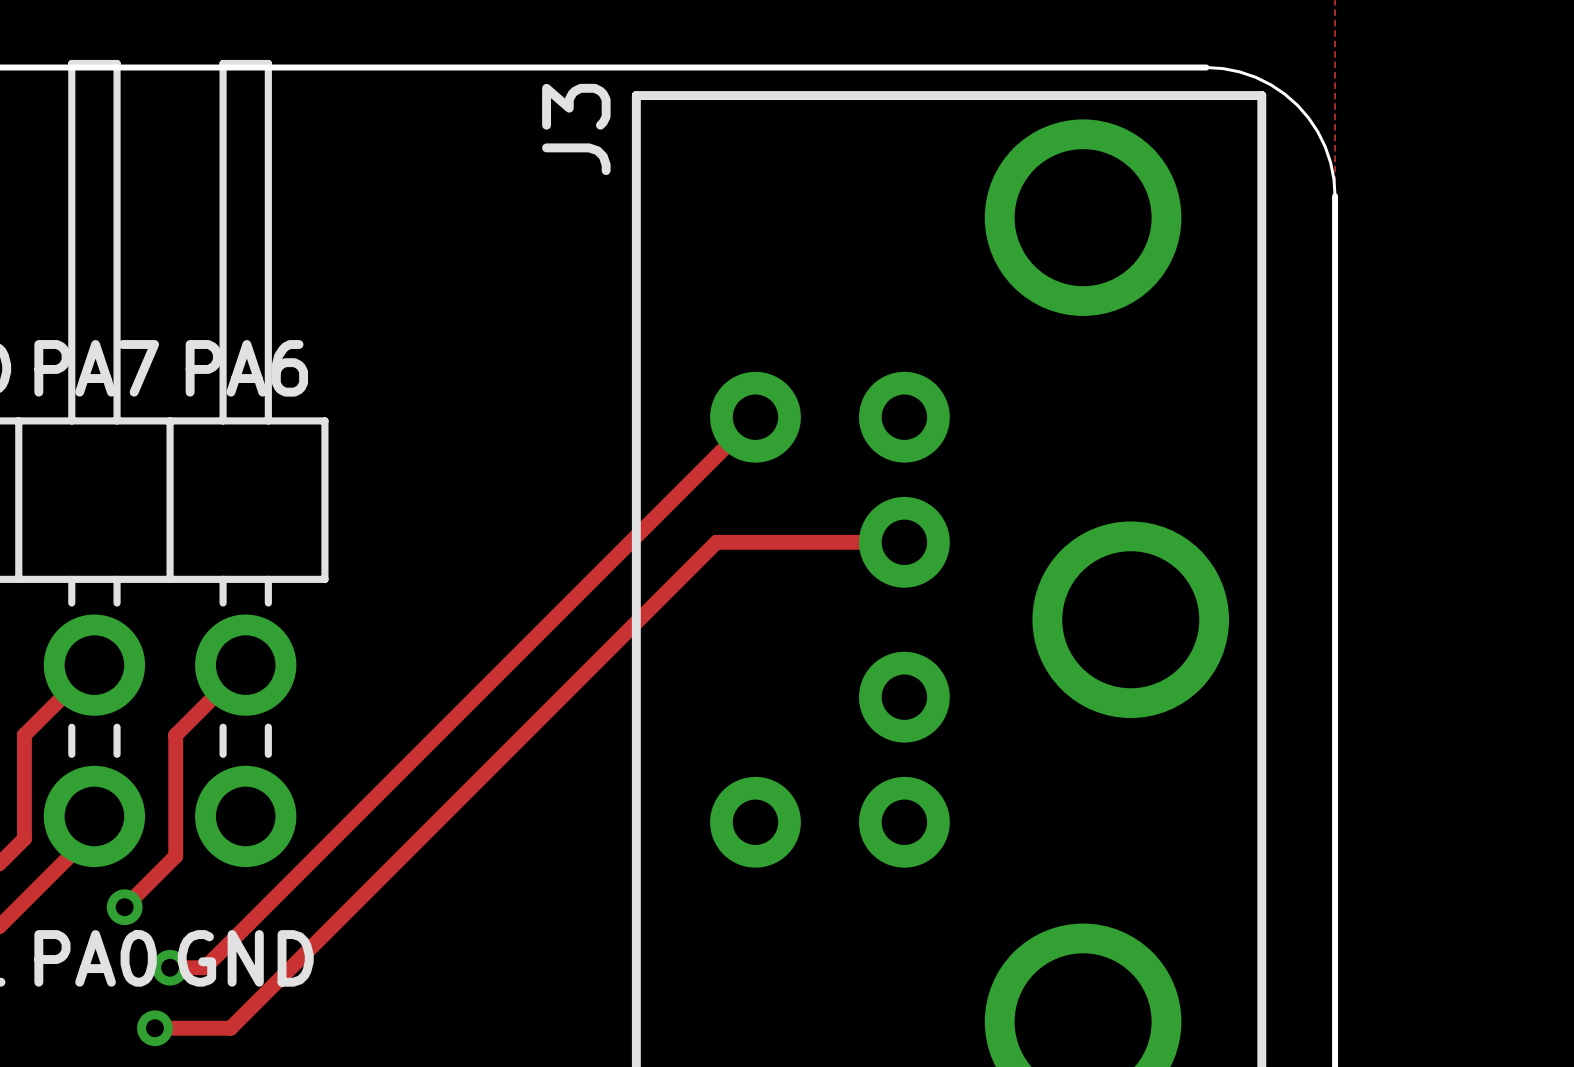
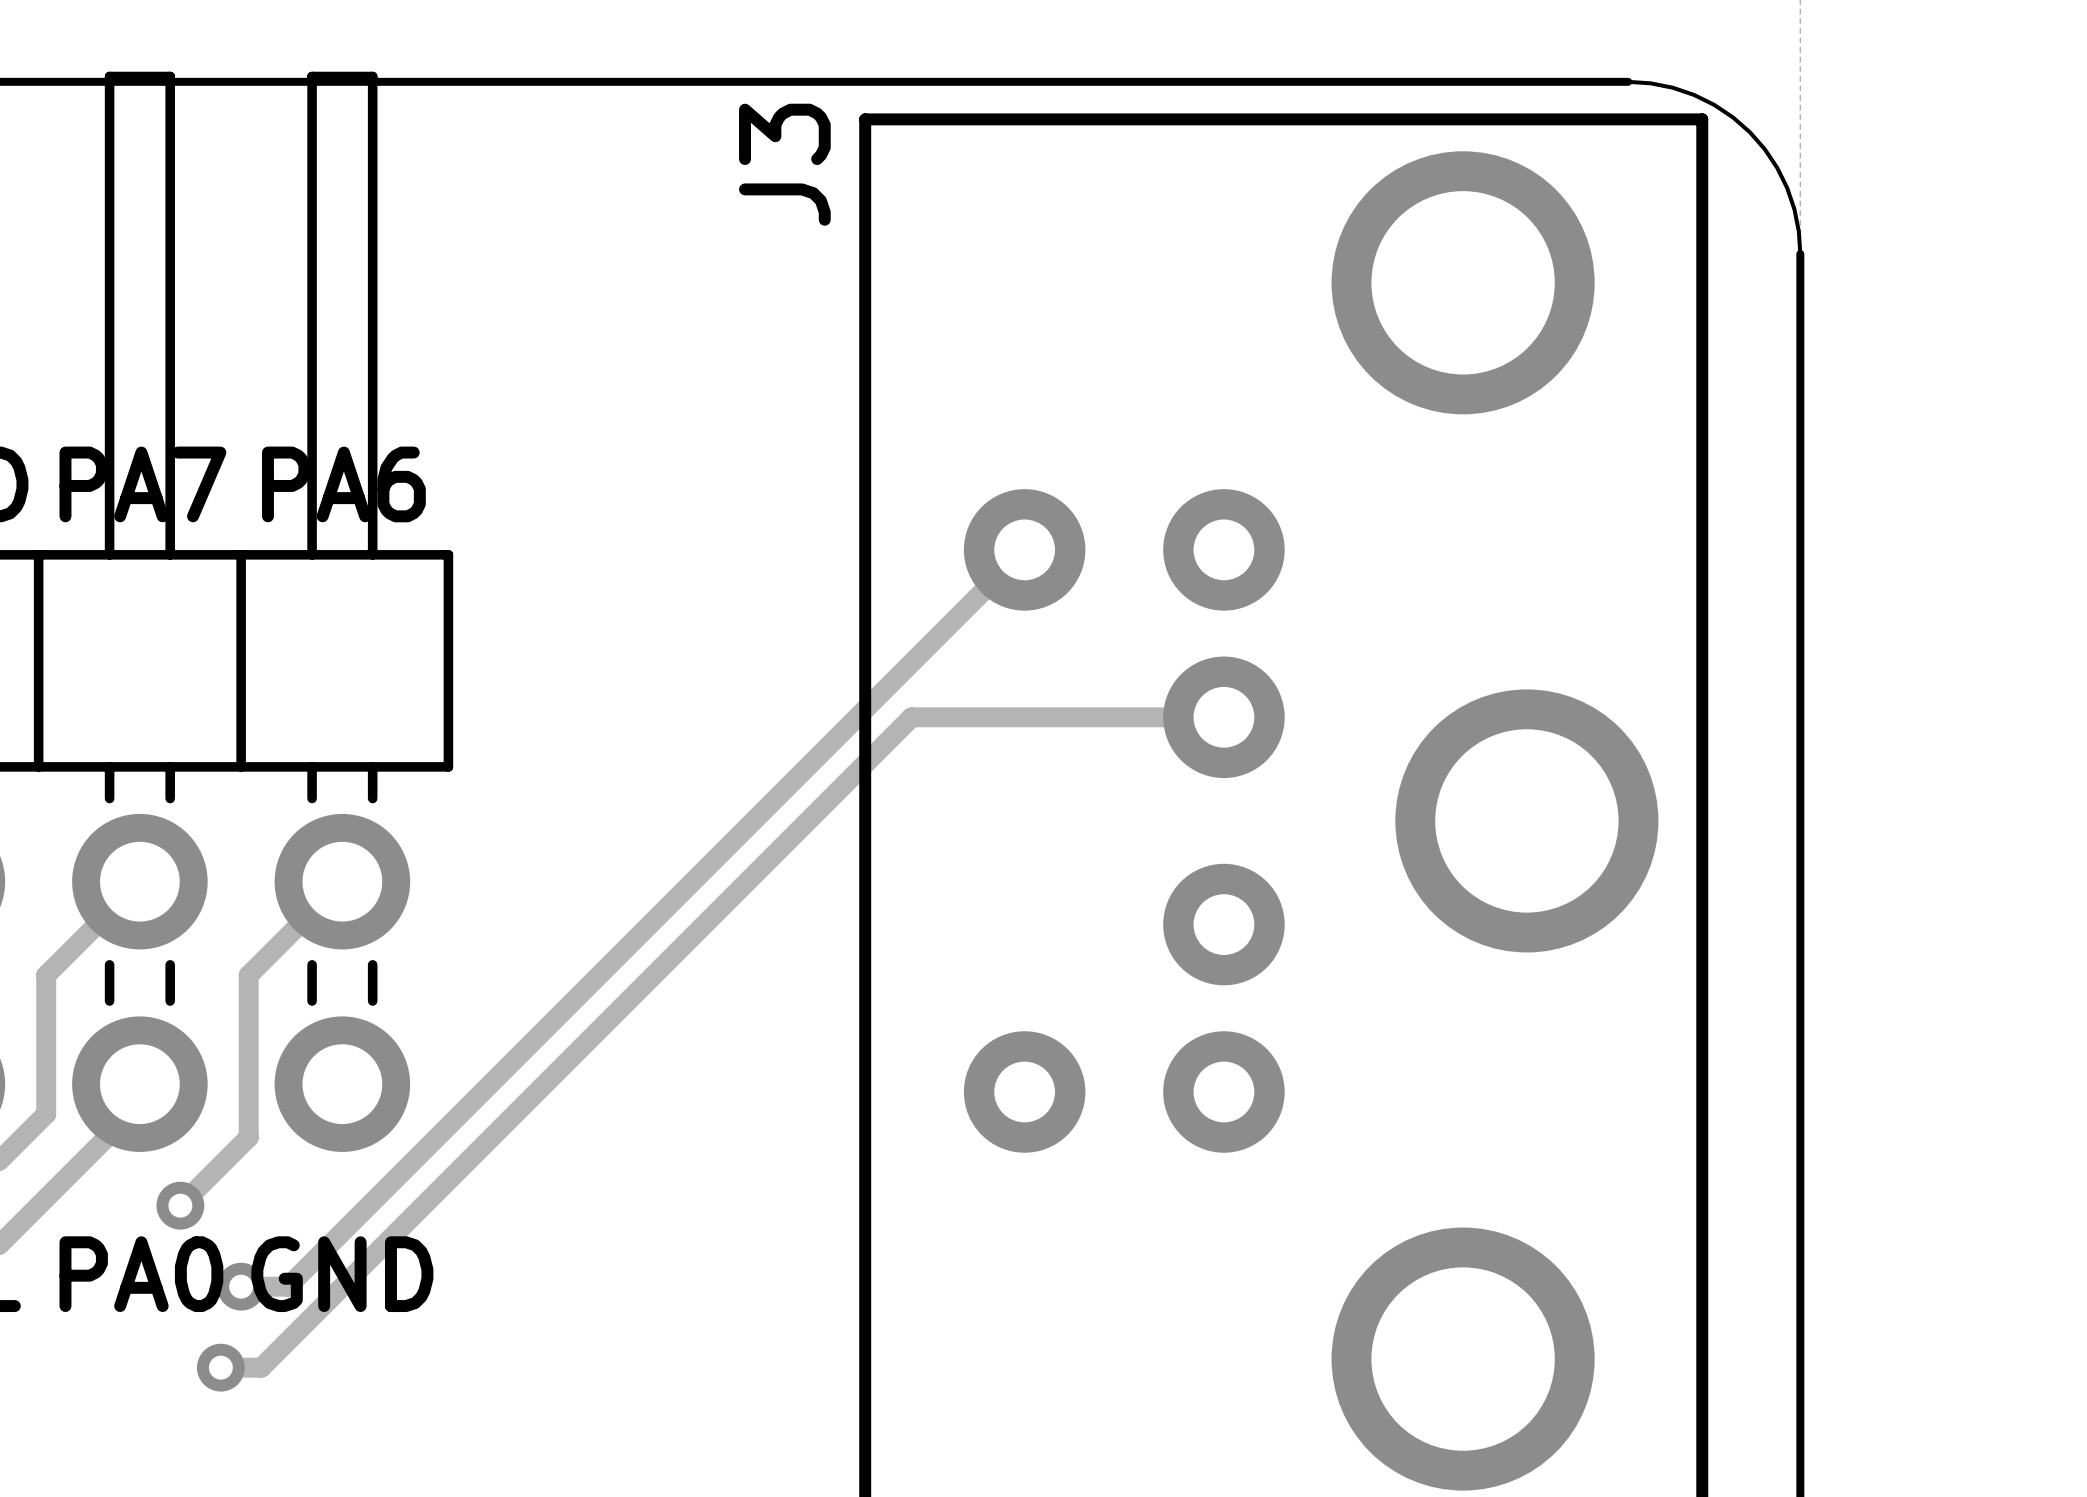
track: (716, 542) (230, 1028) (185, 1028) -> (972, 717) (911, 717) (261, 1367)

